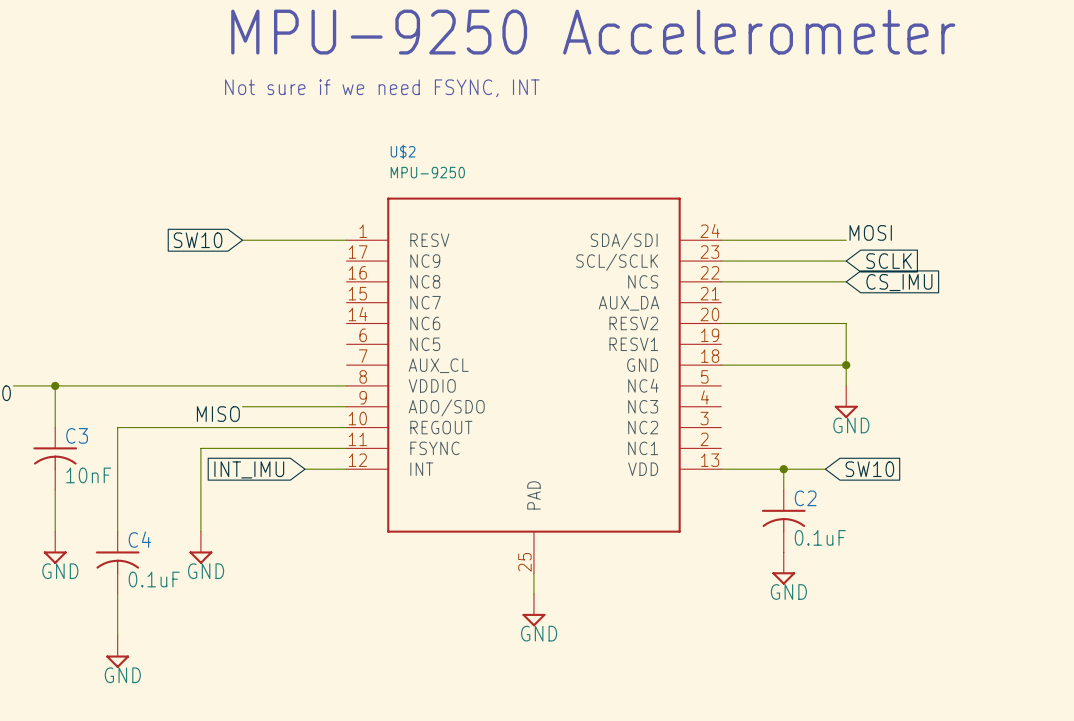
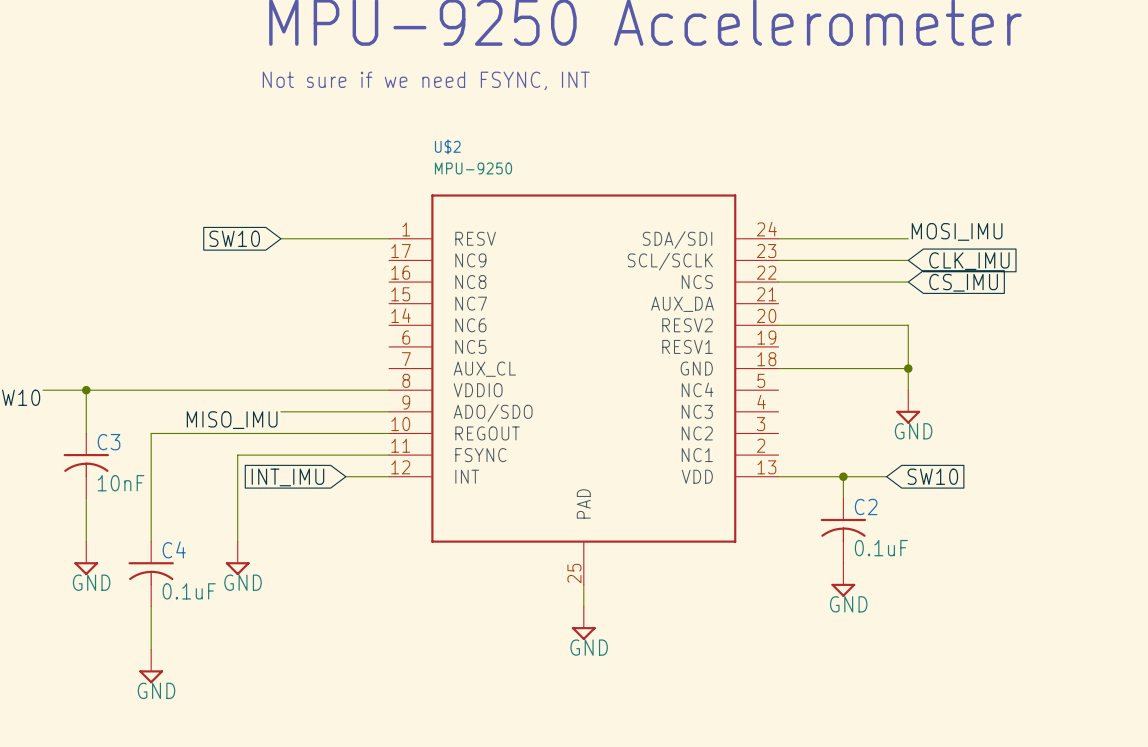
label: MOSI (870, 232) -> MOSI_IMU (957, 231)
global label: SCLK (889, 261) -> CLK_IMU (969, 261)
label: MISO (218, 414) -> MISO_IMU (232, 420)

